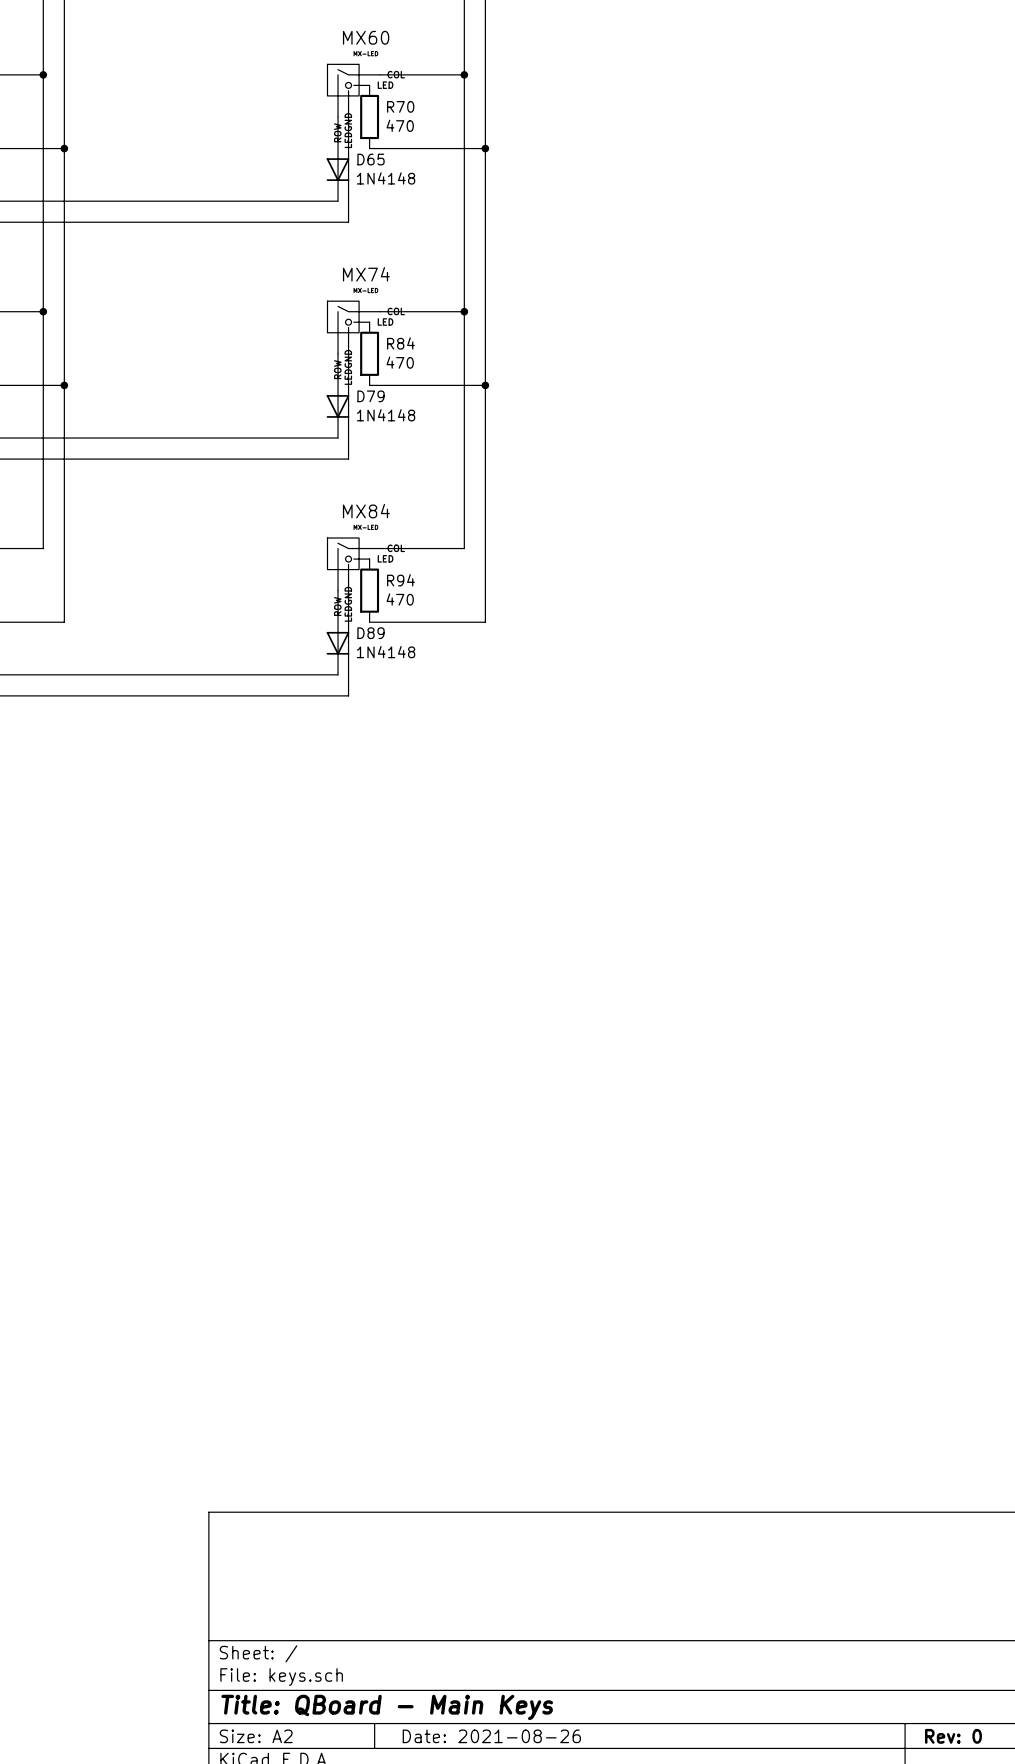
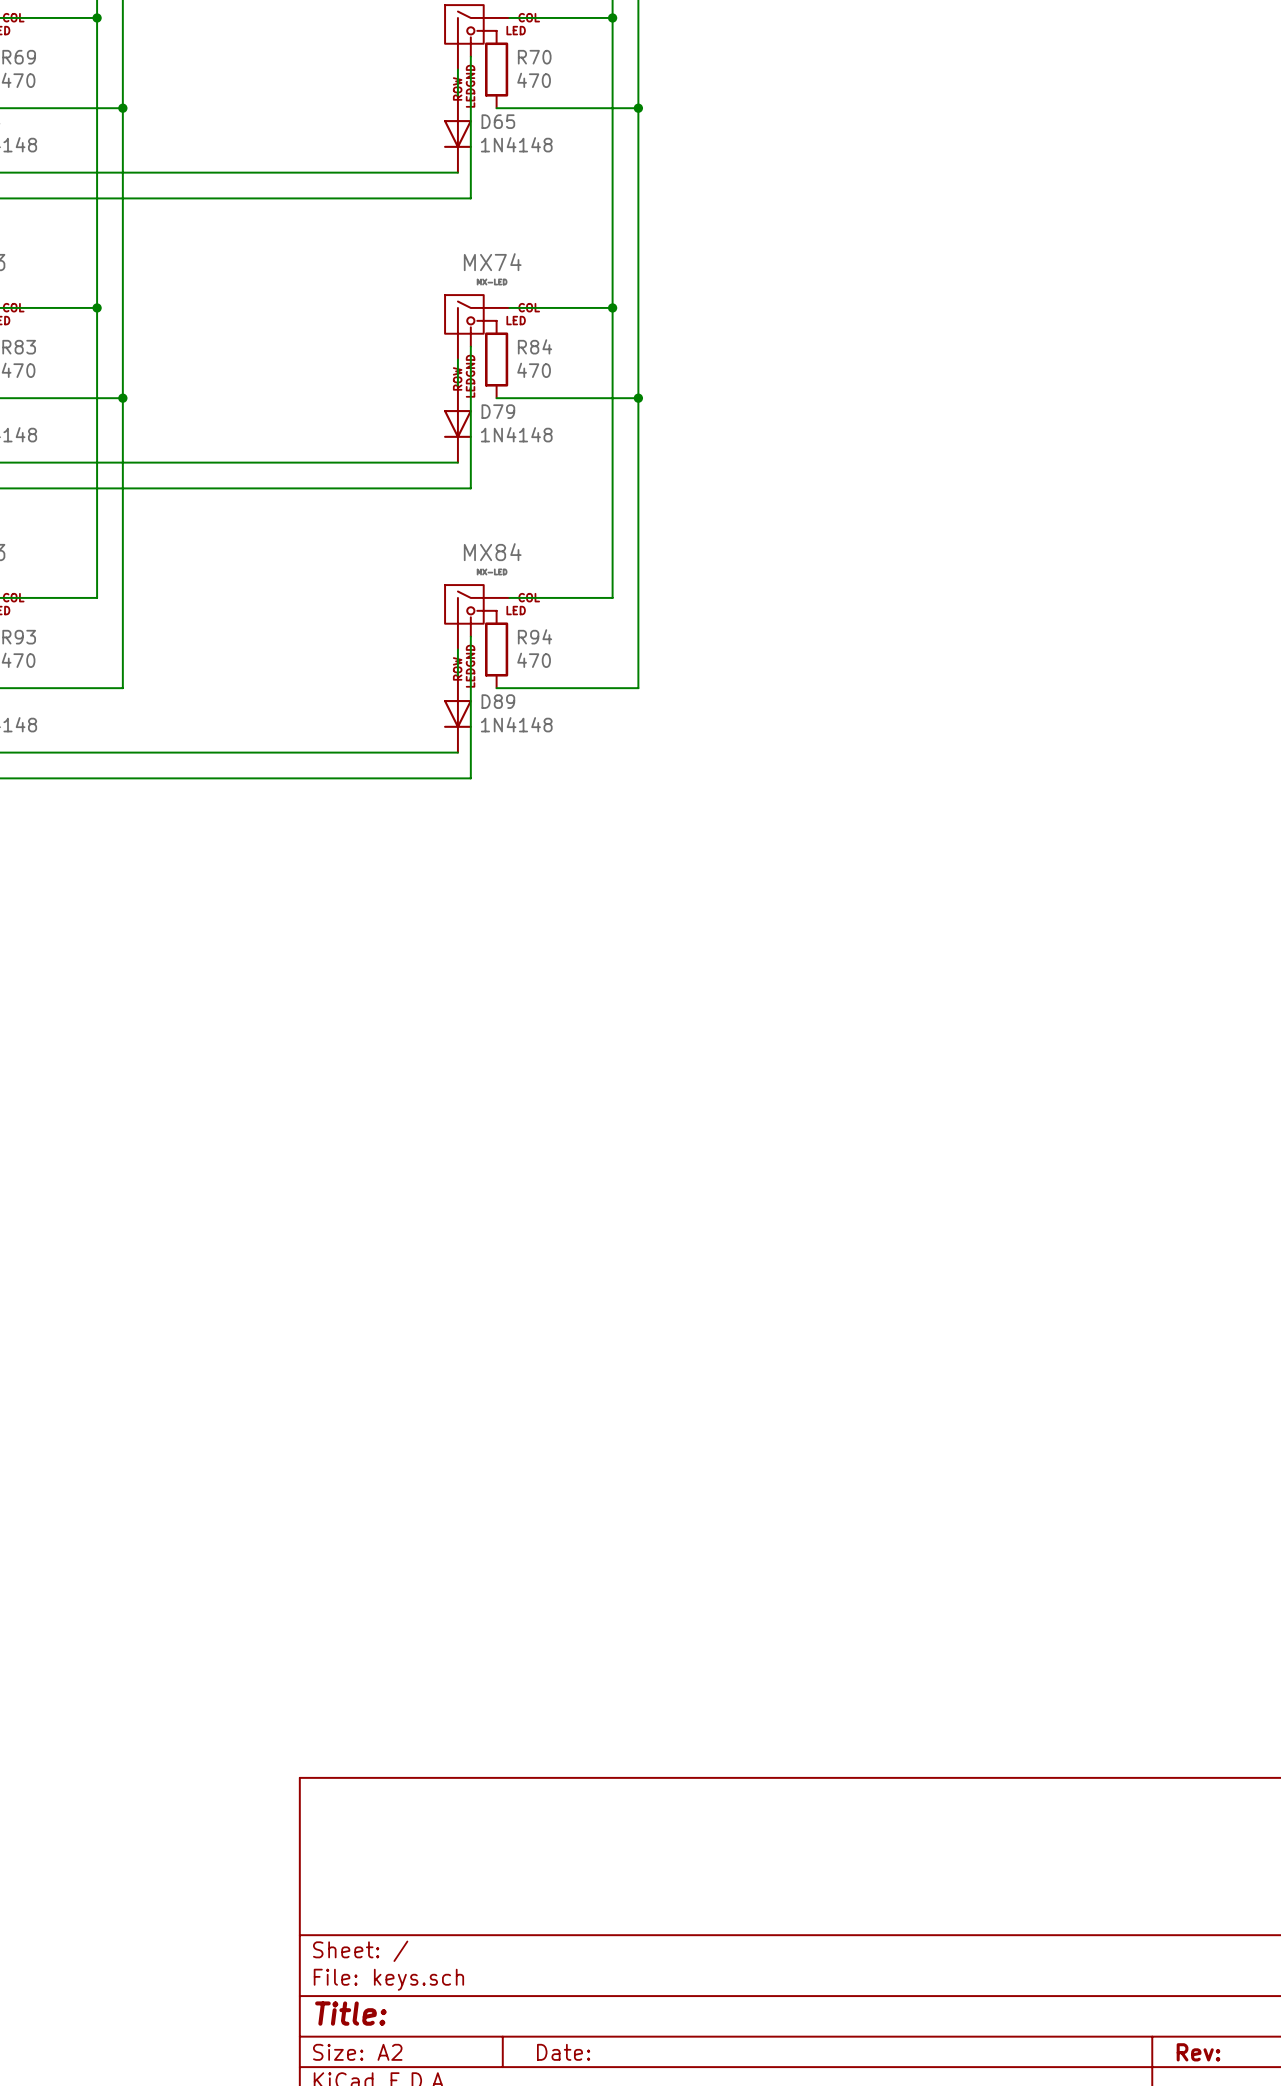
title block: Title: QBoard - Main Keys (387, 1707) -> Title: (350, 2013)
title block: Date: 2021-08-26 (491, 1736) -> Date: (563, 2052)
title block: Rev: 0 (953, 1736) -> Rev: (1198, 2052)

